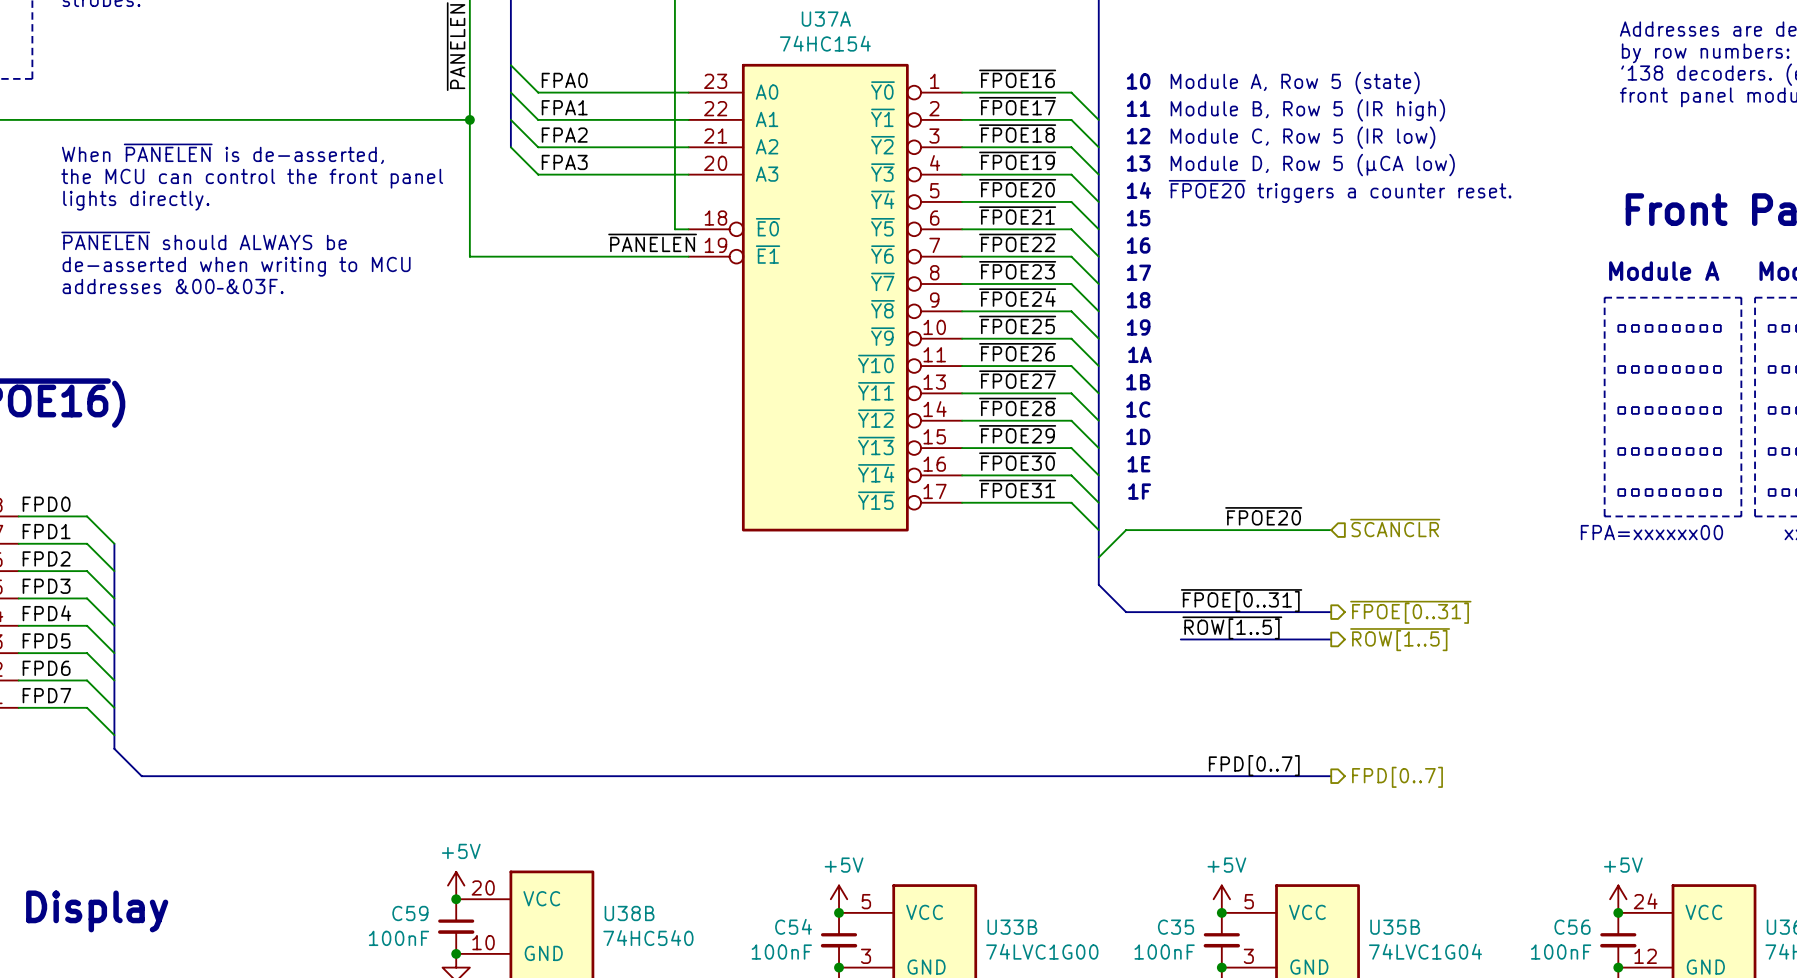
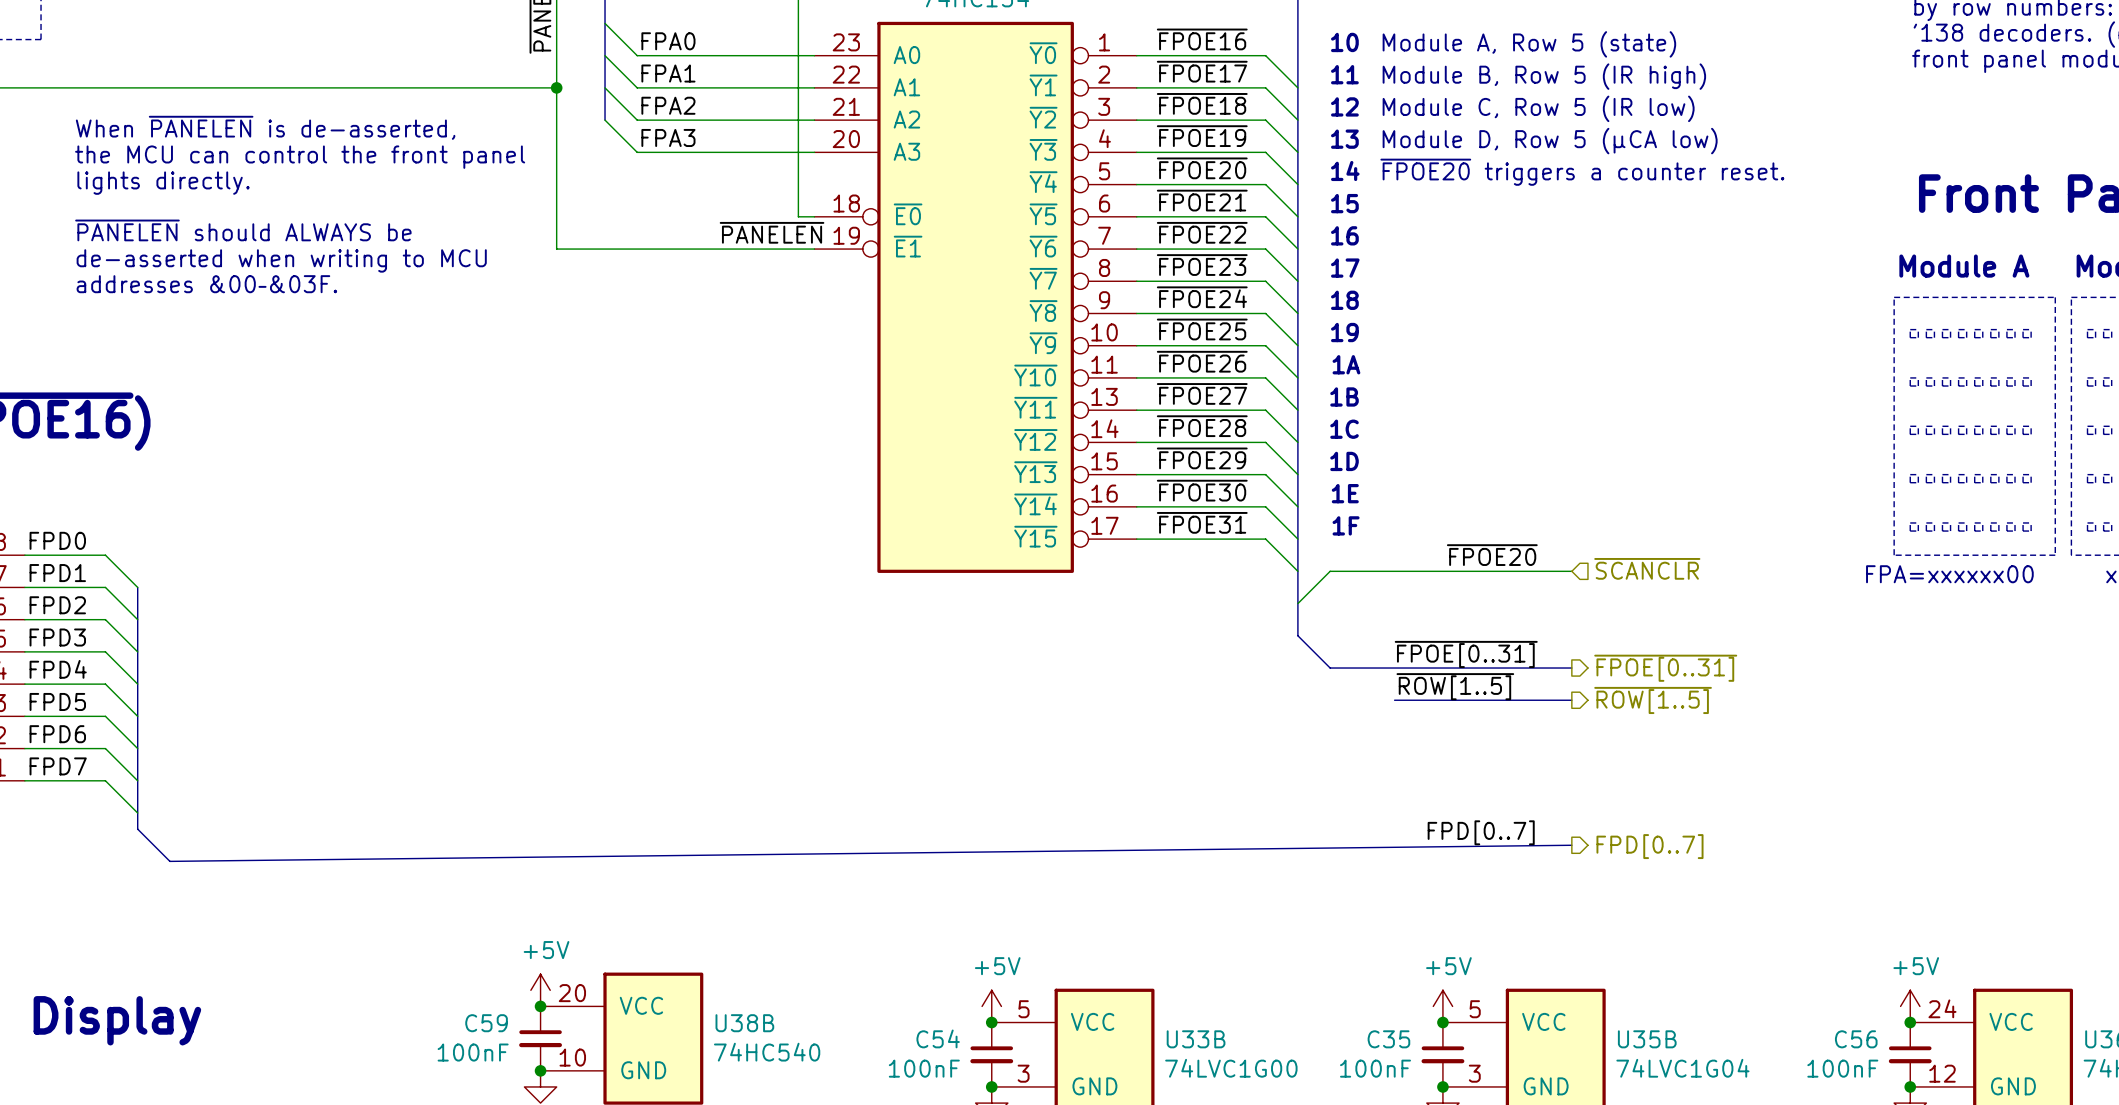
label position: FPD[0..7] (1254, 765) -> FPD[0..7] (1481, 832)
bus: (141, 776) (1331, 776) -> (169, 861) (1571, 845)
hierarchical label position: FPD[0..7] (1397, 777) -> FPD[0..7] (1649, 846)

